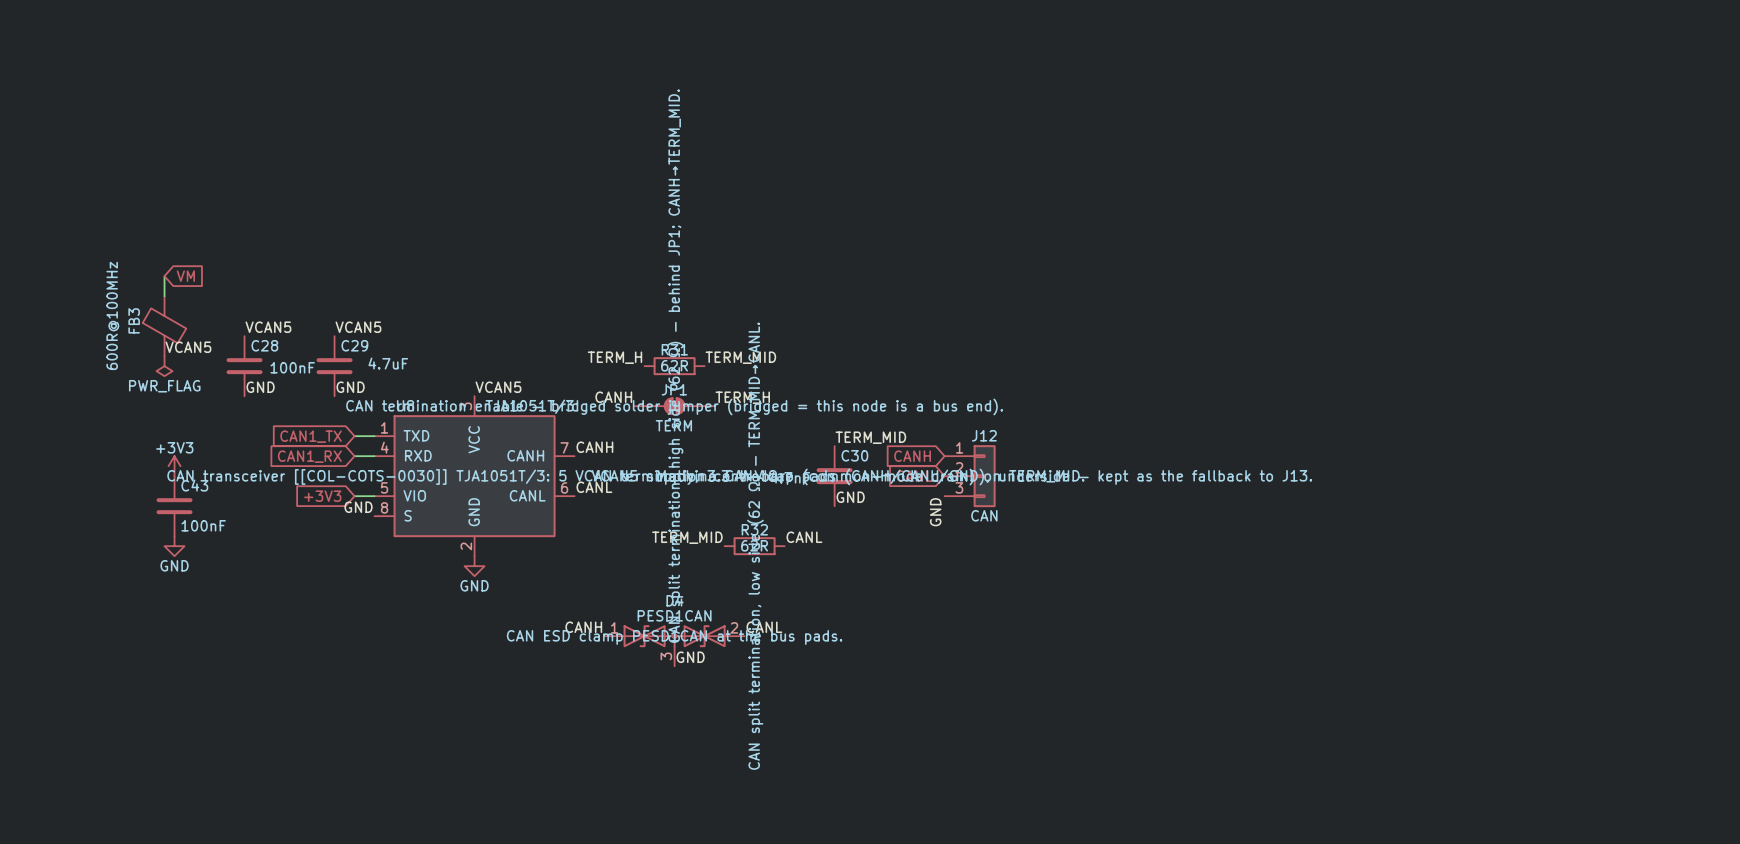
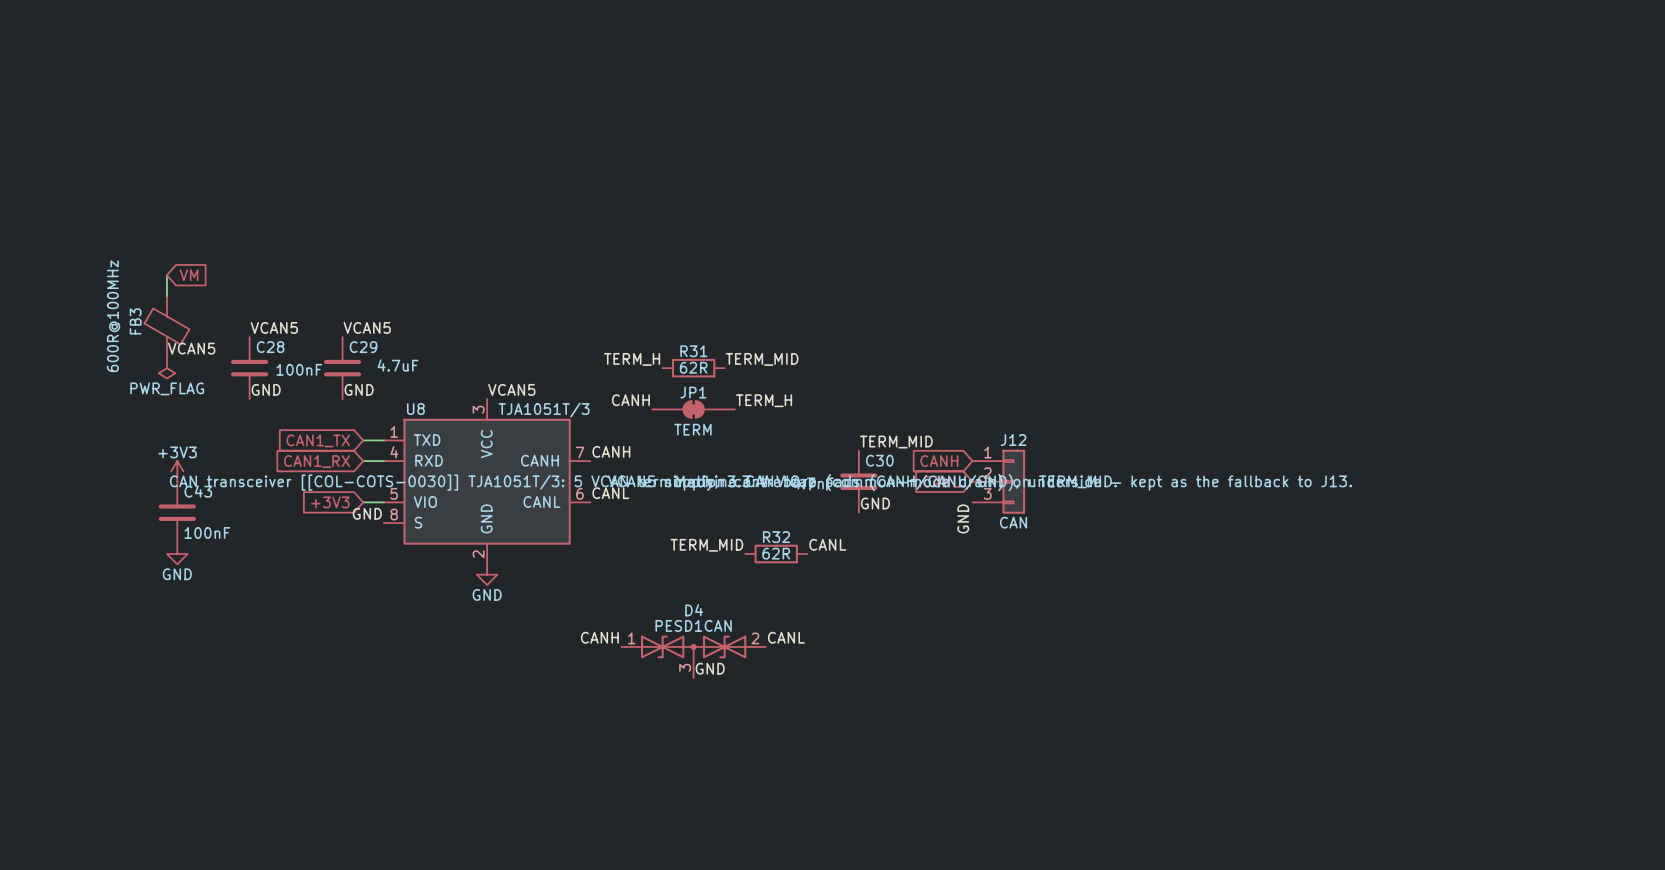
R31 text: CAN split termination, high side (62 Ω) — behind JP1; CANH→TERM_MID. (675, 366) -> none
JP1 text: CAN termination enable — bridged solder jumper (bridged = this node is a bus end). (674, 406) -> none
R32 text: CAN split termination, low side (62 Ω) — TERM_MID→CANL. (755, 546) -> none
D4 text: CAN ESD clamp PESD1CAN at the bus pads. (674, 637) -> none

